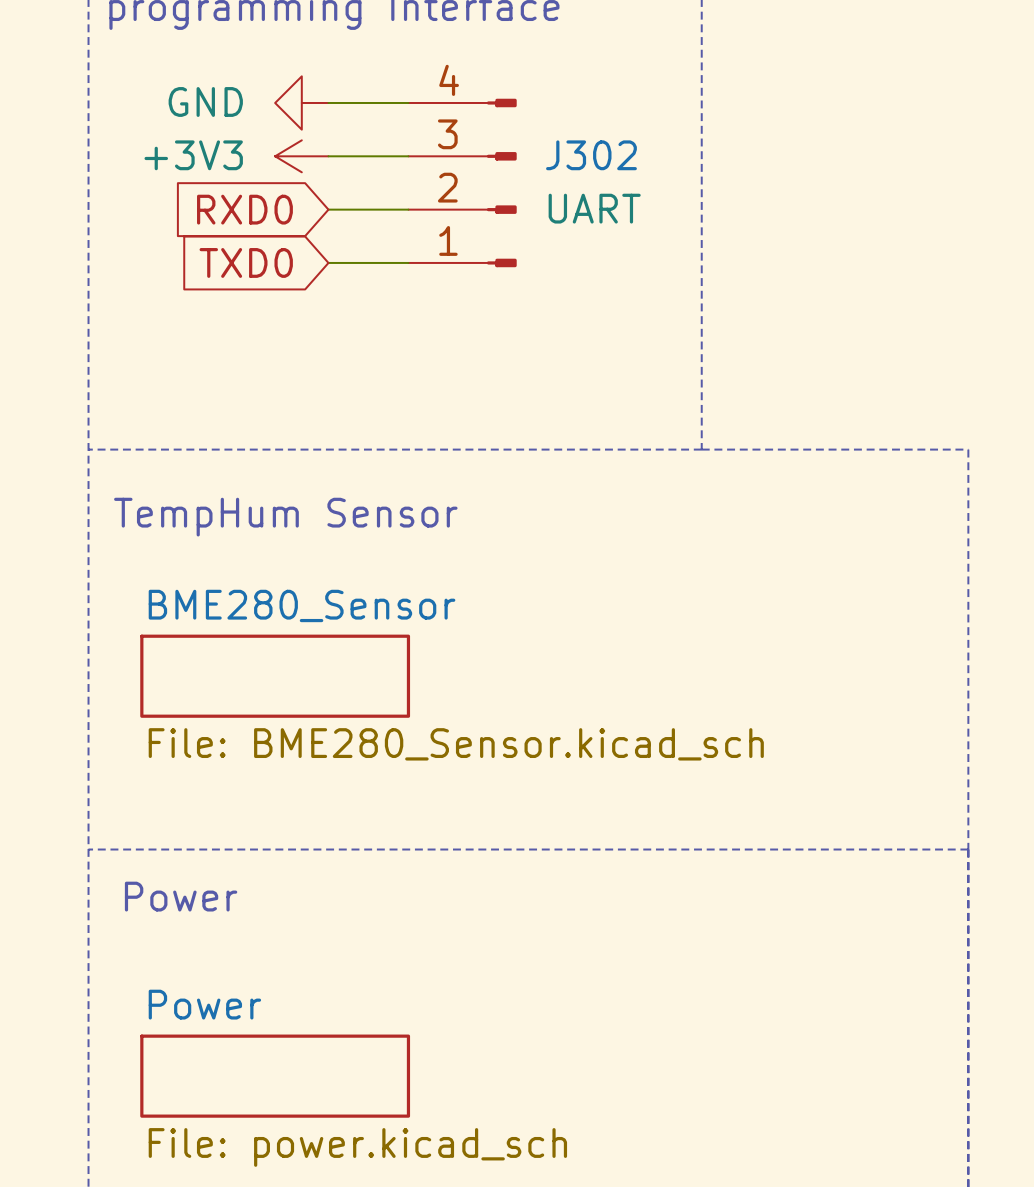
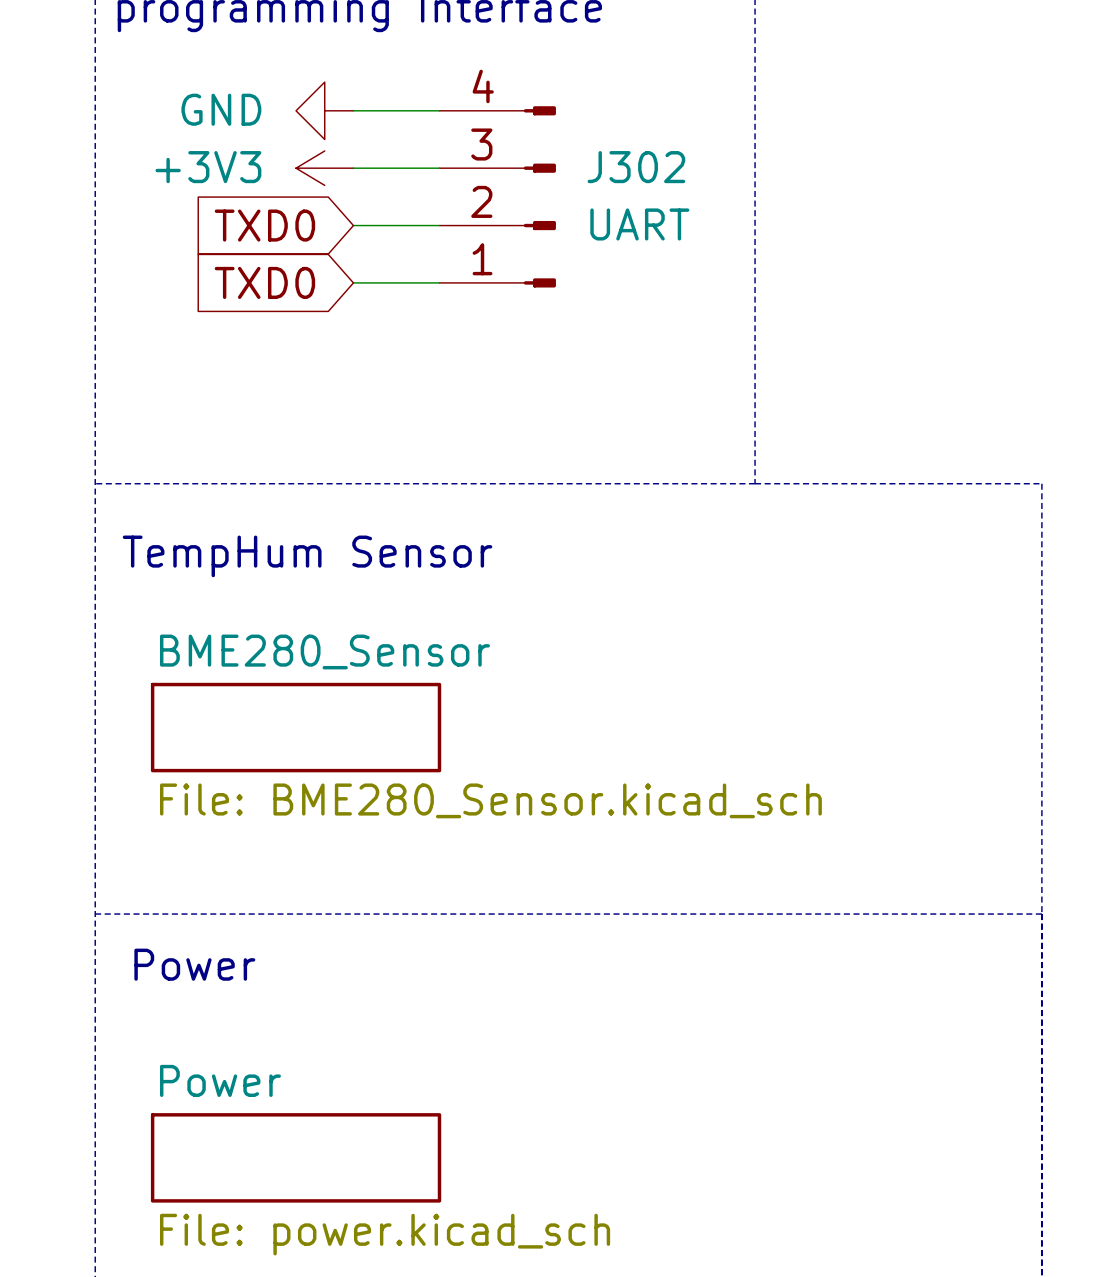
global label: RXD0 (244, 209) -> TXD0 (264, 225)

